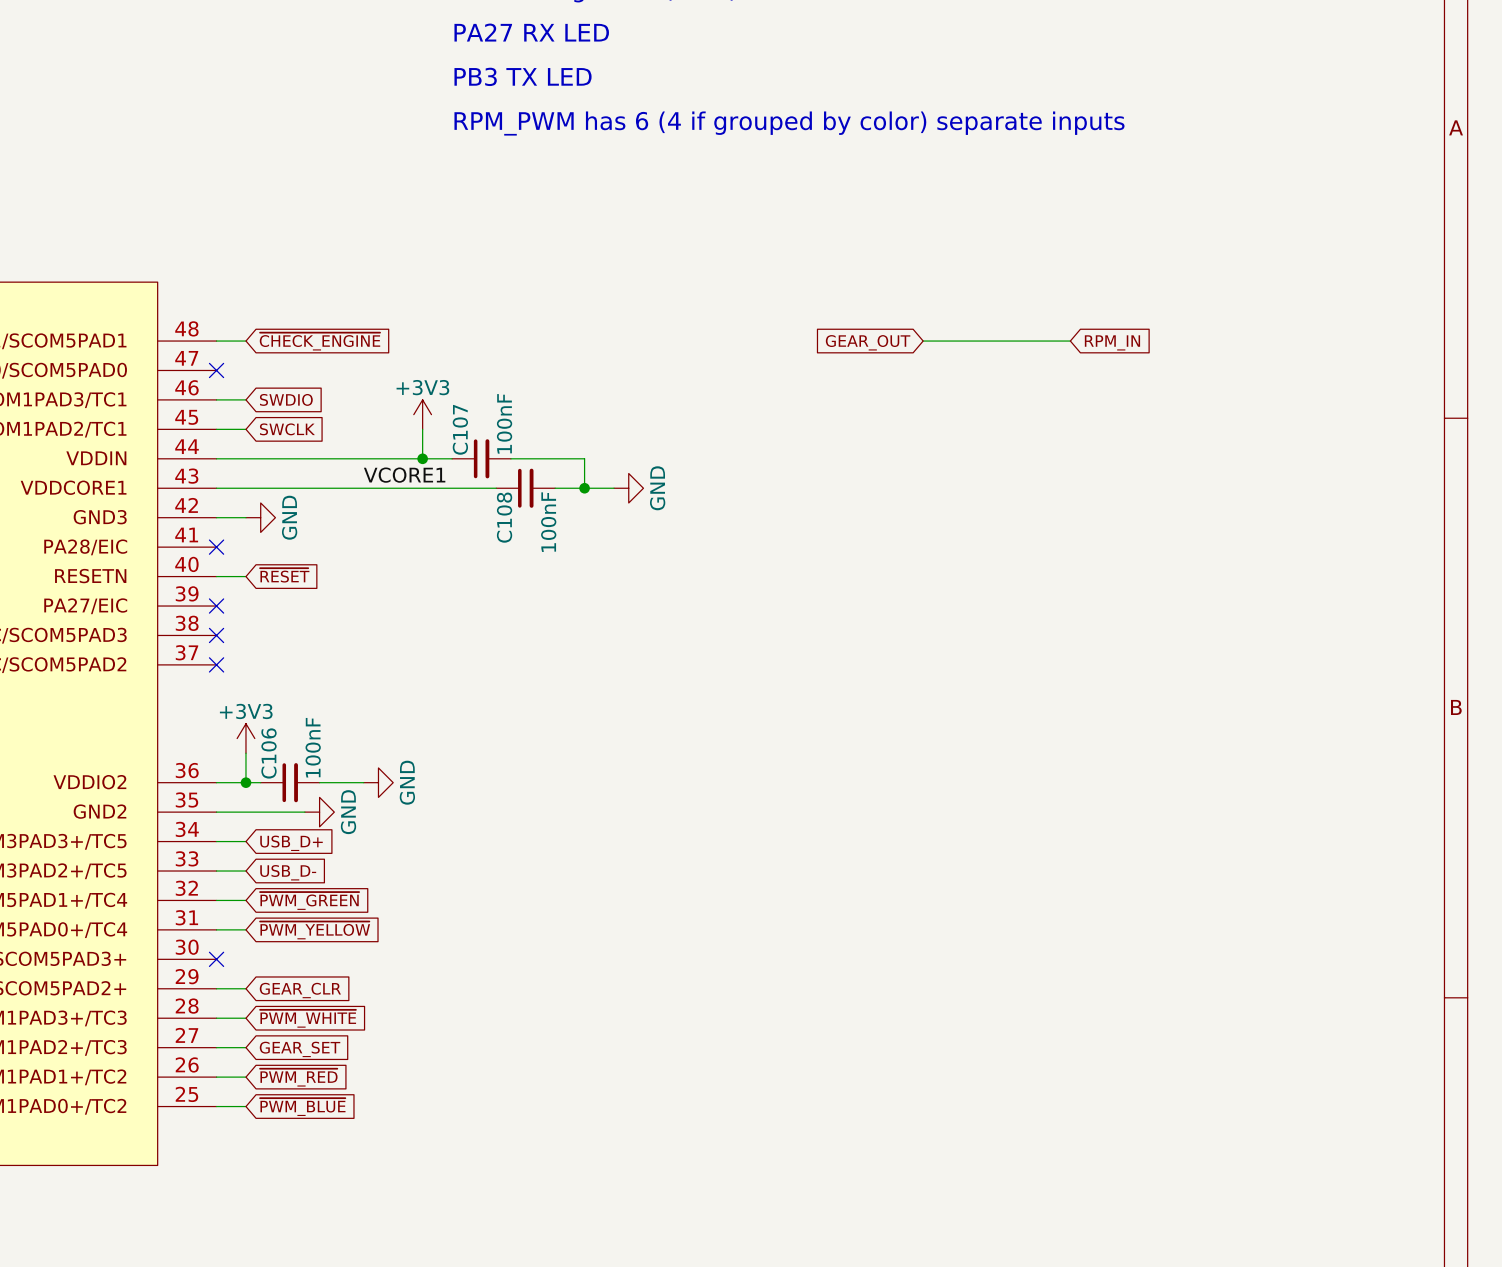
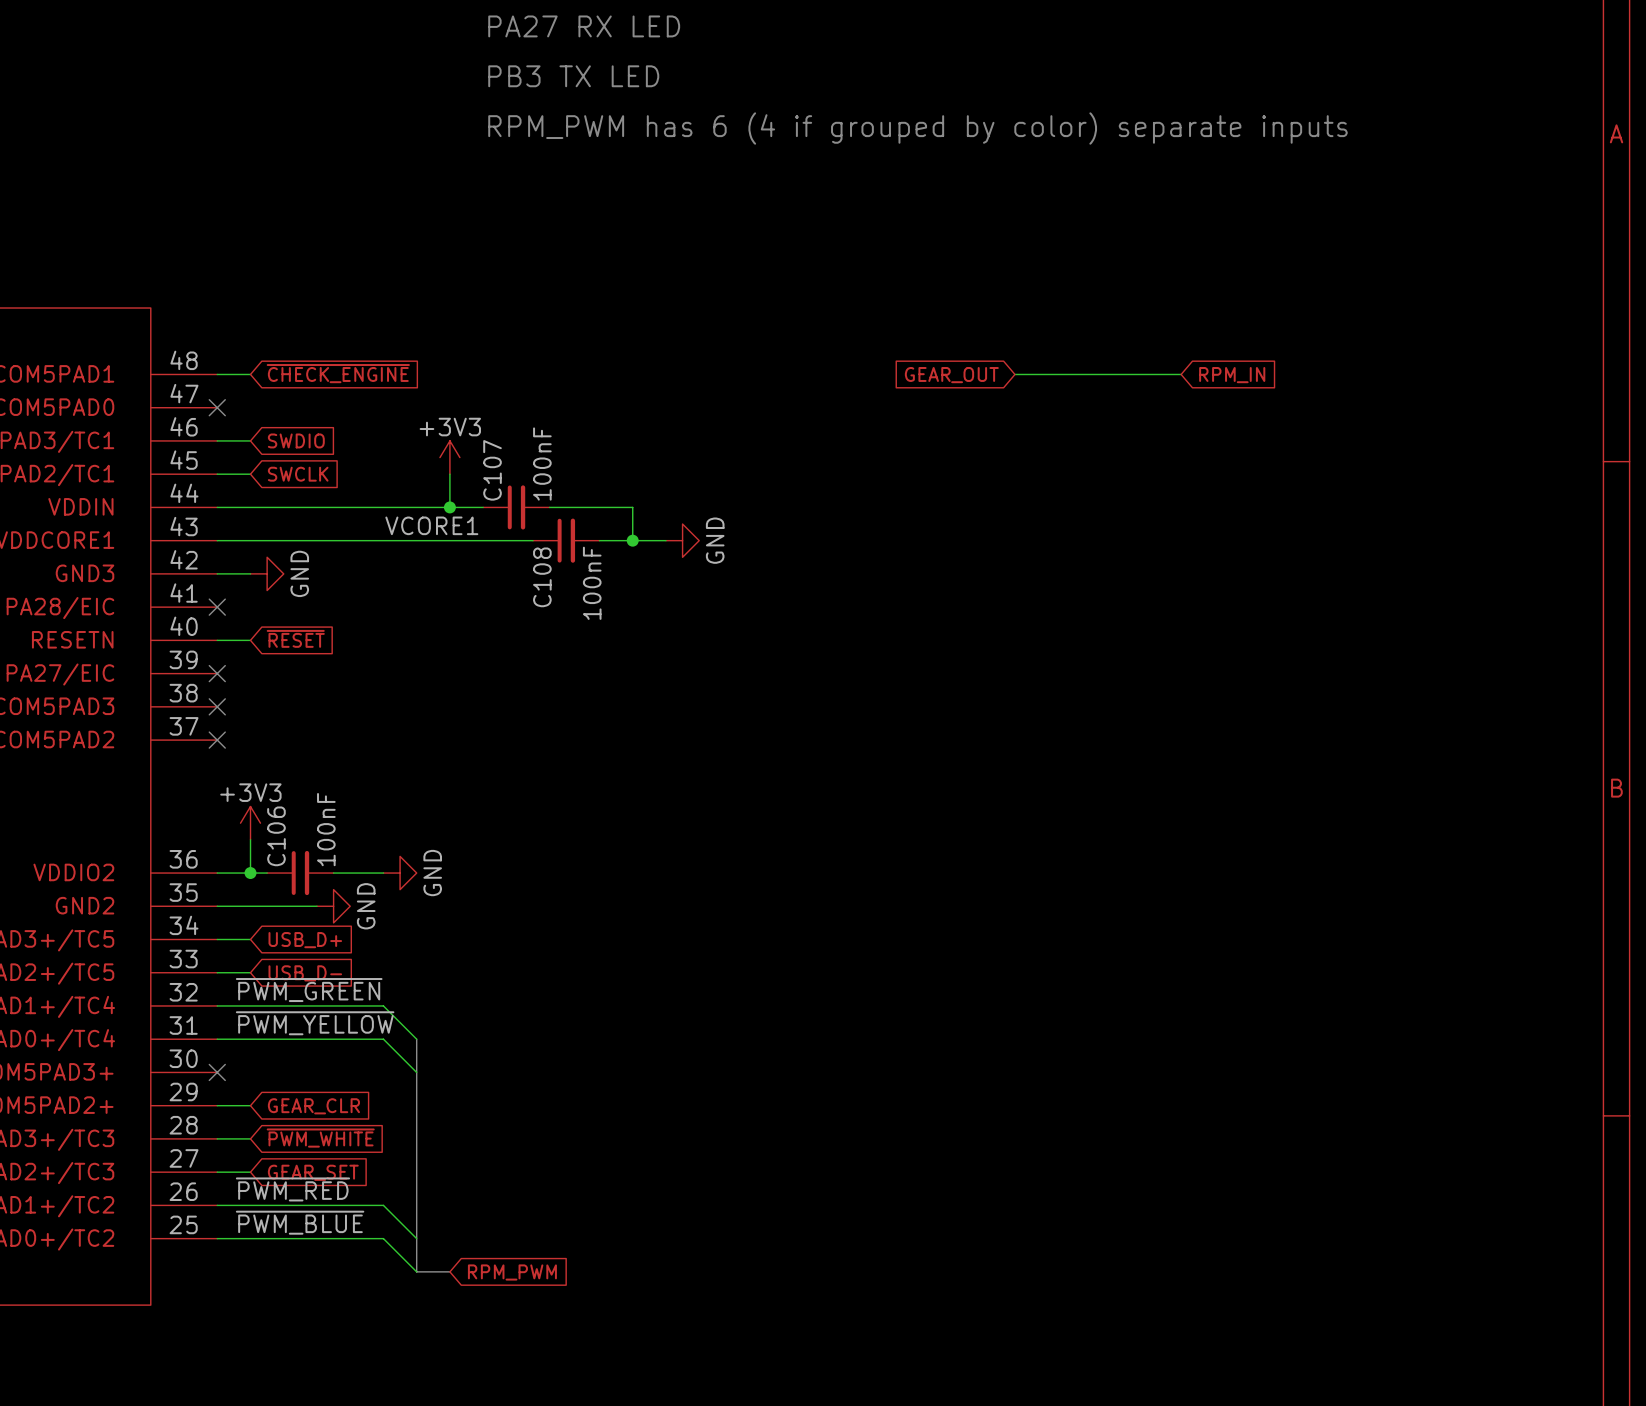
label: none -> ~{PWM_GREEN} (309, 990)
wire: none -> (250, 1005) (383, 1005) (416, 1039)
global label: ~{PWM_GREEN} (309, 900) -> none
label: none -> ~{PWM_YELLOW} (315, 1023)
wire: none -> (250, 1039) (383, 1039) (416, 1072)
bus: none -> (416, 1039) (416, 1271) (449, 1271)
global label: ~{PWM_YELLOW} (315, 930) -> none
label: none -> ~{PWM_RED} (292, 1189)
wire: none -> (250, 1205) (383, 1205) (416, 1238)
global label: ~{PWM_RED} (298, 1077) -> none
label: none -> ~{PWM_BLUE} (300, 1222)
wire: none -> (250, 1238) (383, 1238) (416, 1271)
global label: ~{PWM_BLUE} (302, 1107) -> none
global label: none -> RPM_PWM (512, 1272)

